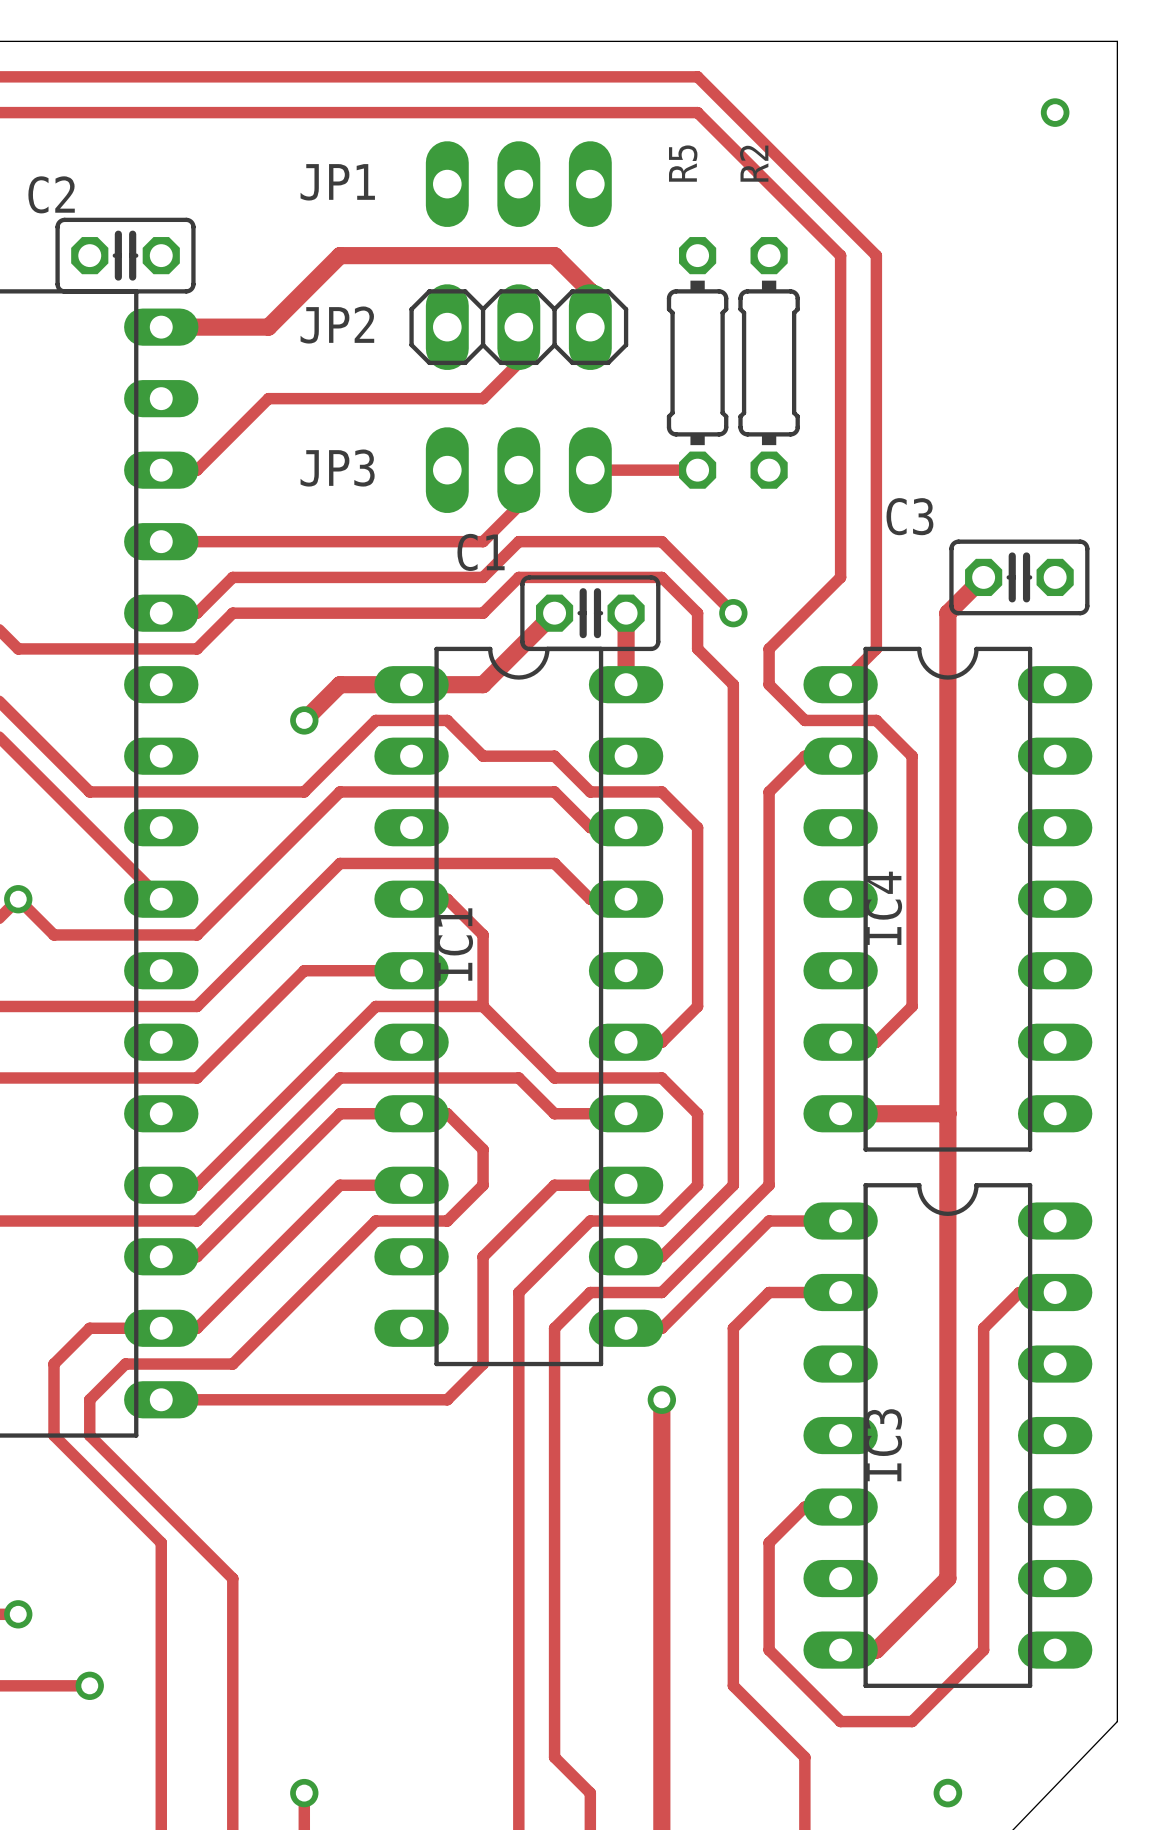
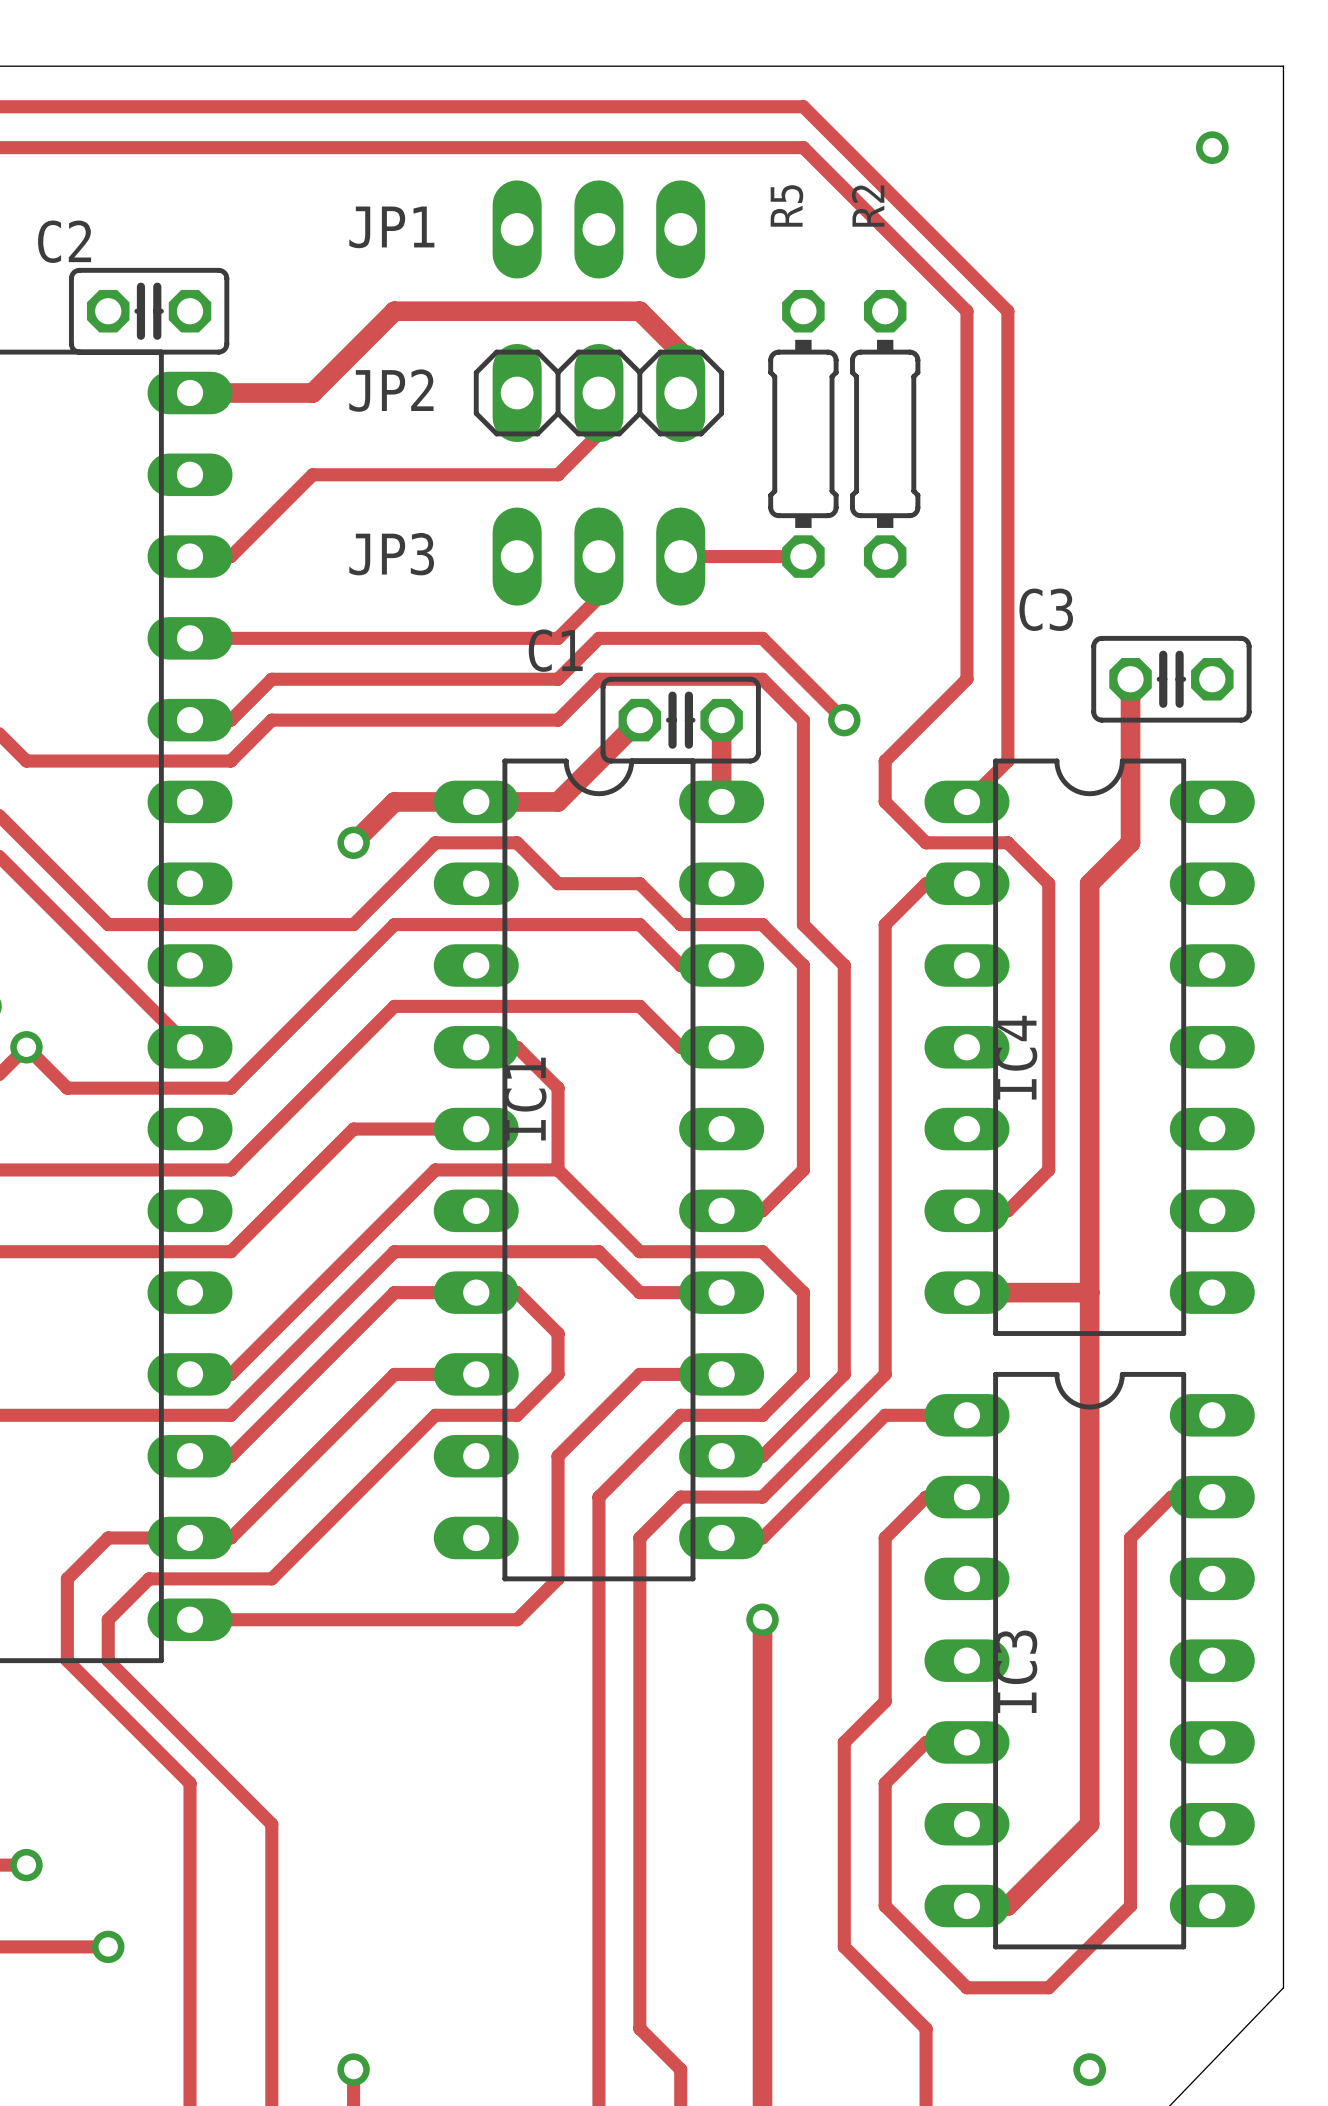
track: (983, 577) (947, 613) (947, 756) -> (1130, 679) (1130, 842) (1089, 883)
track: (697, 648) (733, 684) (733, 827) -> (803, 761) (803, 924) (844, 965)
track: (804, 1292) (769, 1292) (733, 1328) (733, 1507) -> (926, 1497) (885, 1537) (885, 1701) (844, 1742)

